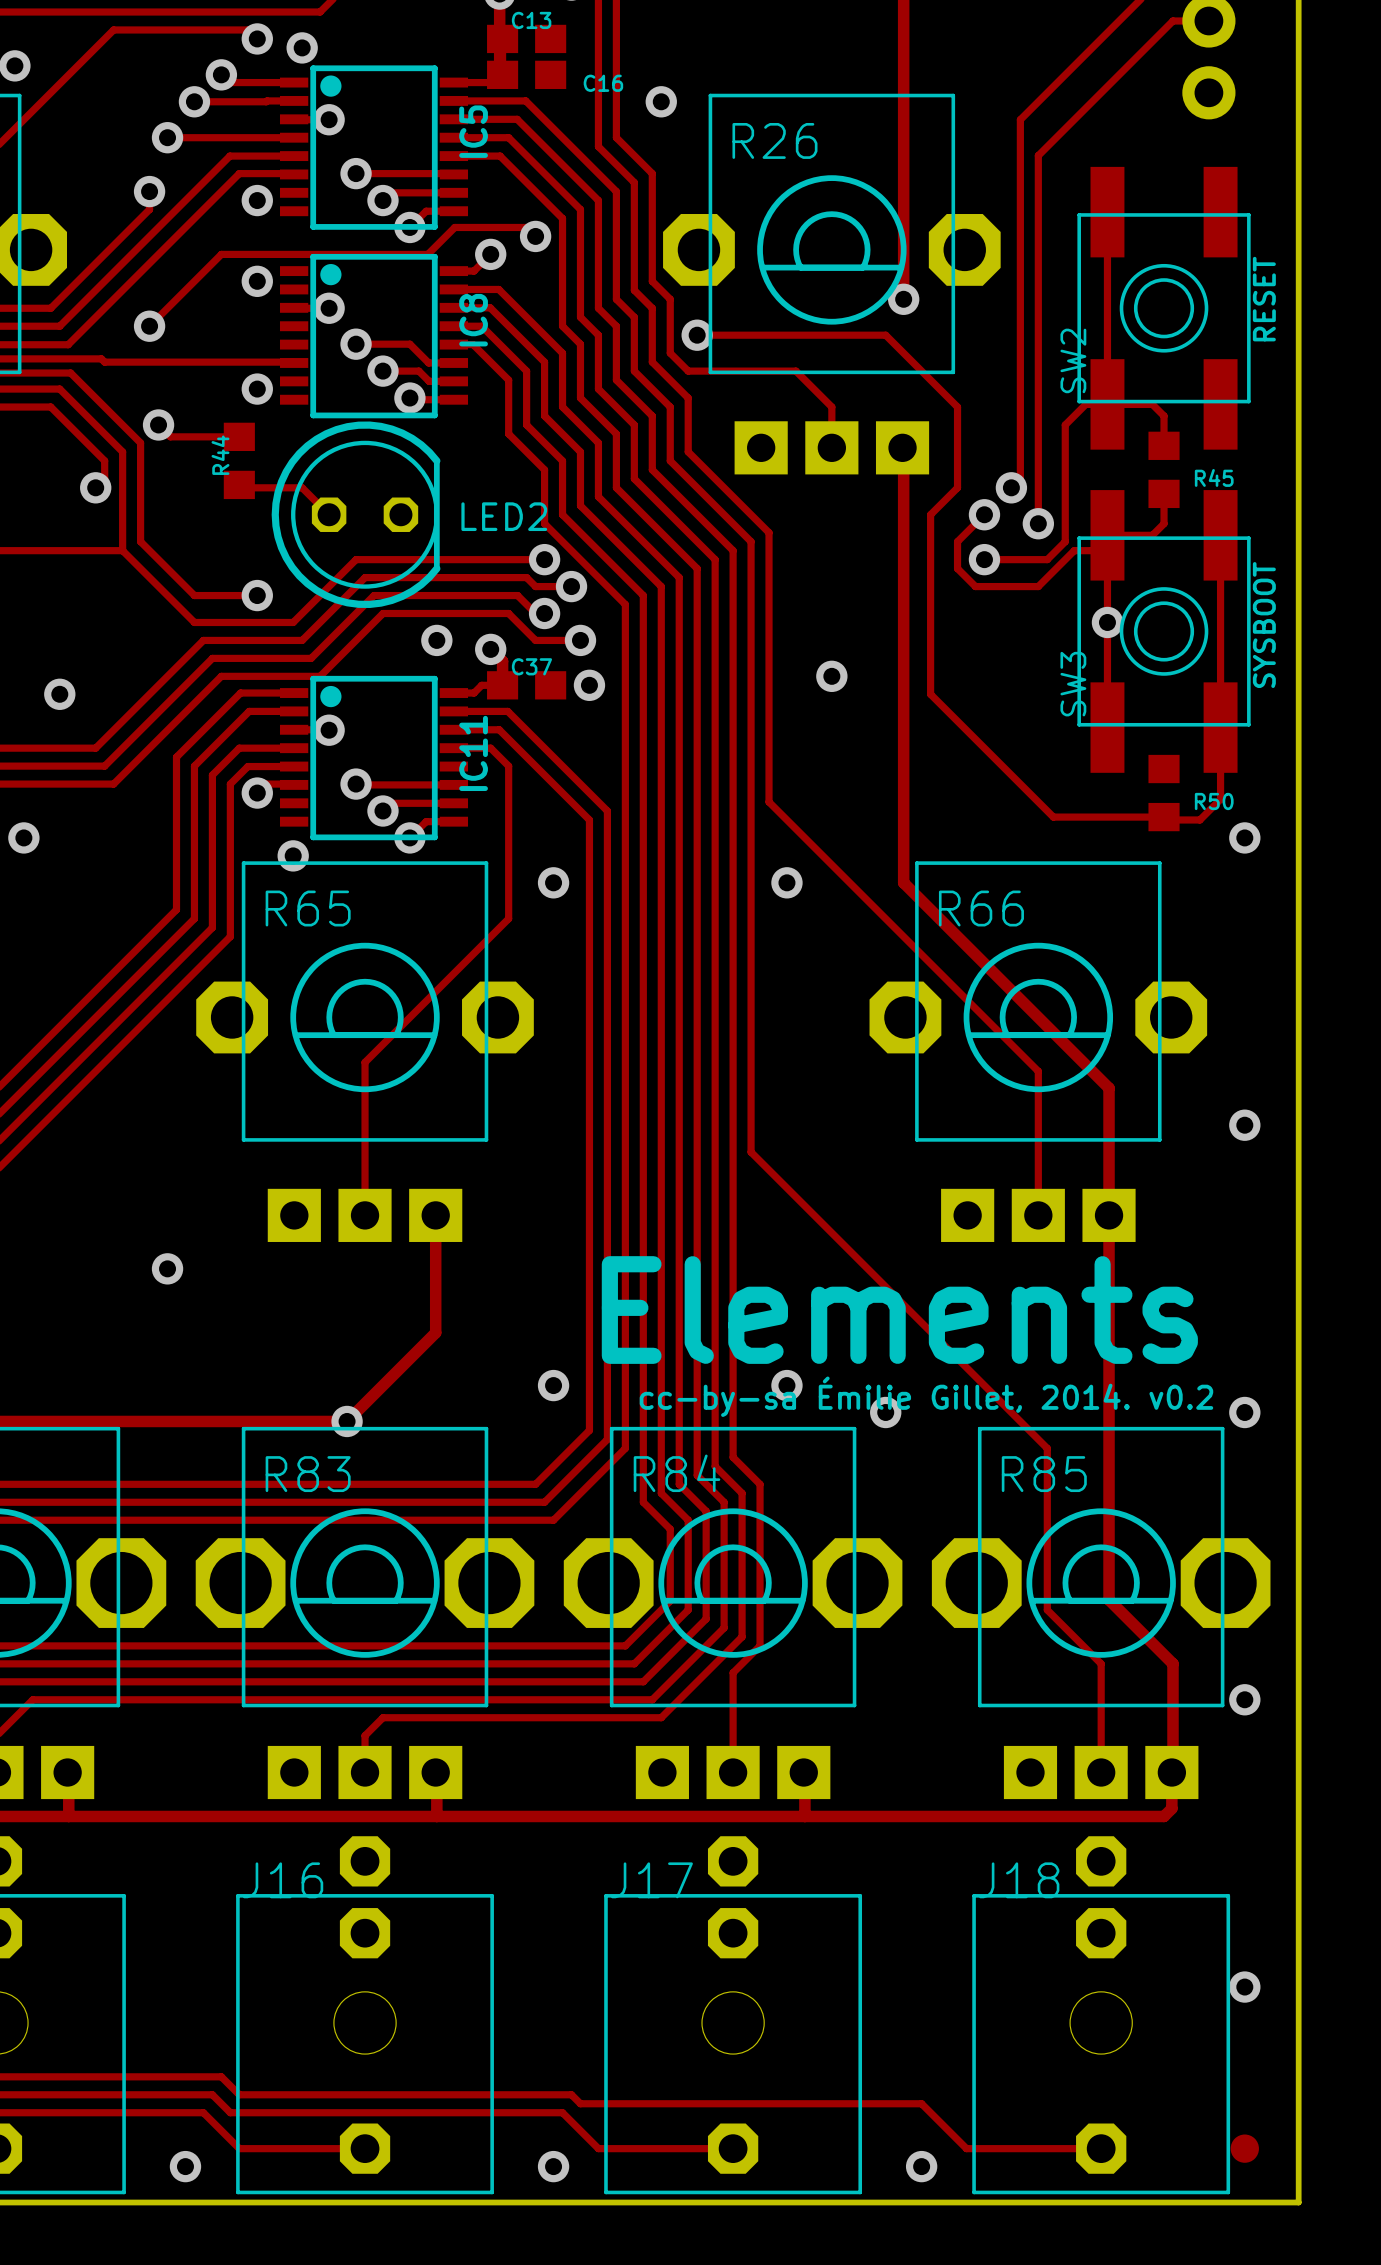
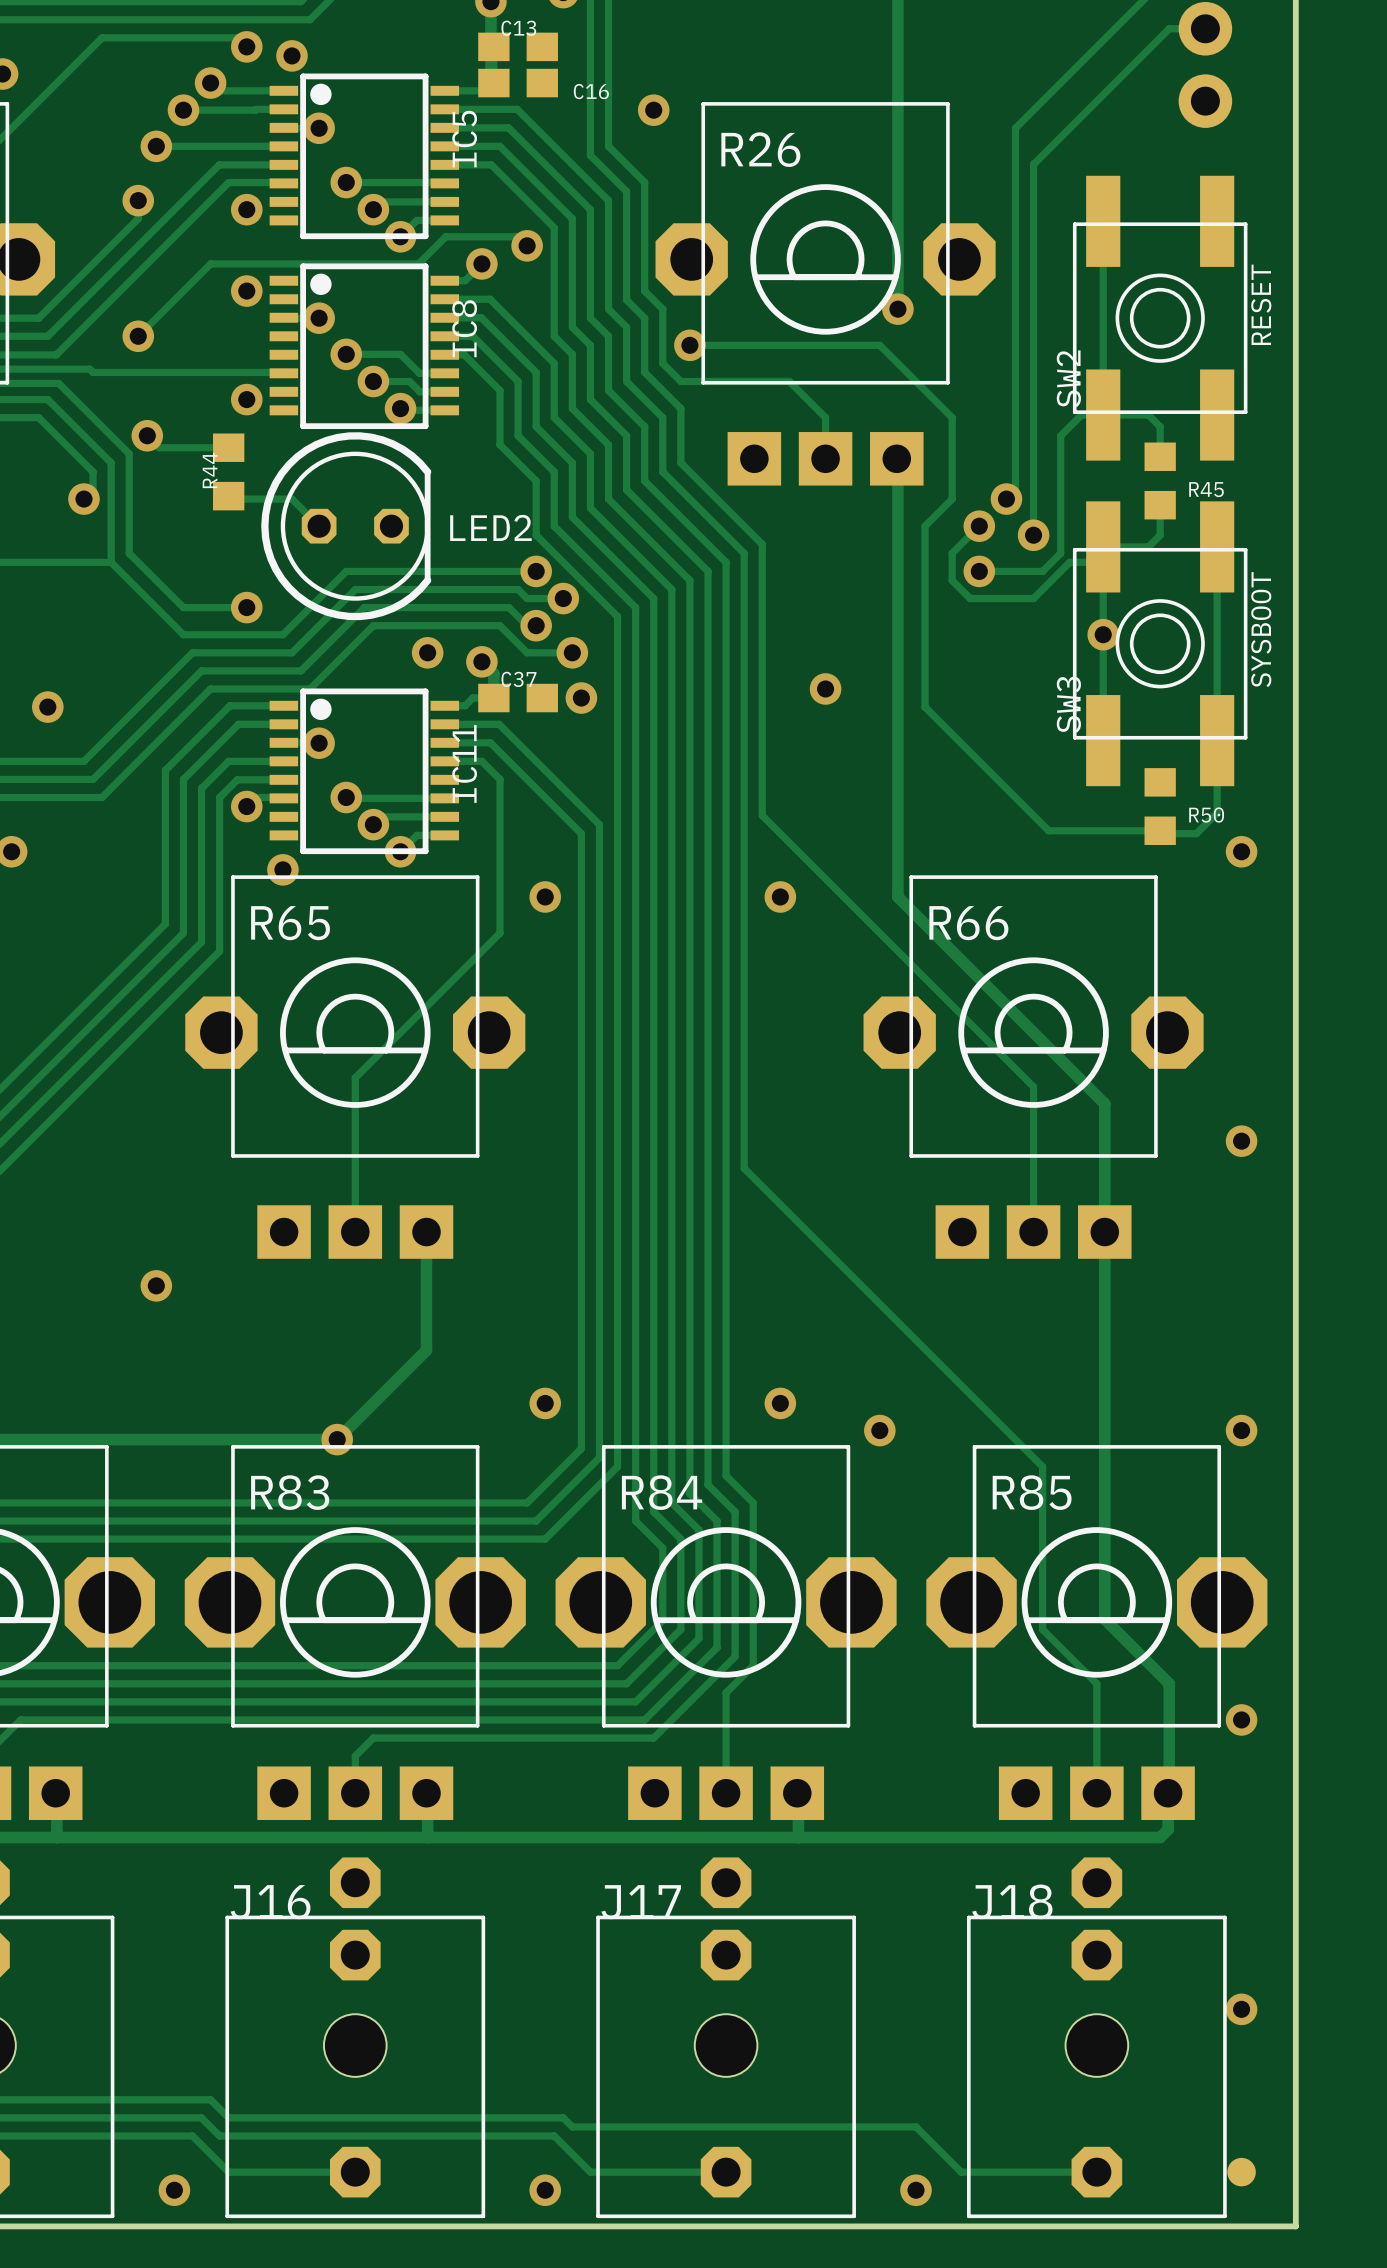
text: Elements (899, 1310) -> none
text: cc-by-sa Émilie Gillet, 2014. v0.2 (926, 1396) -> none

